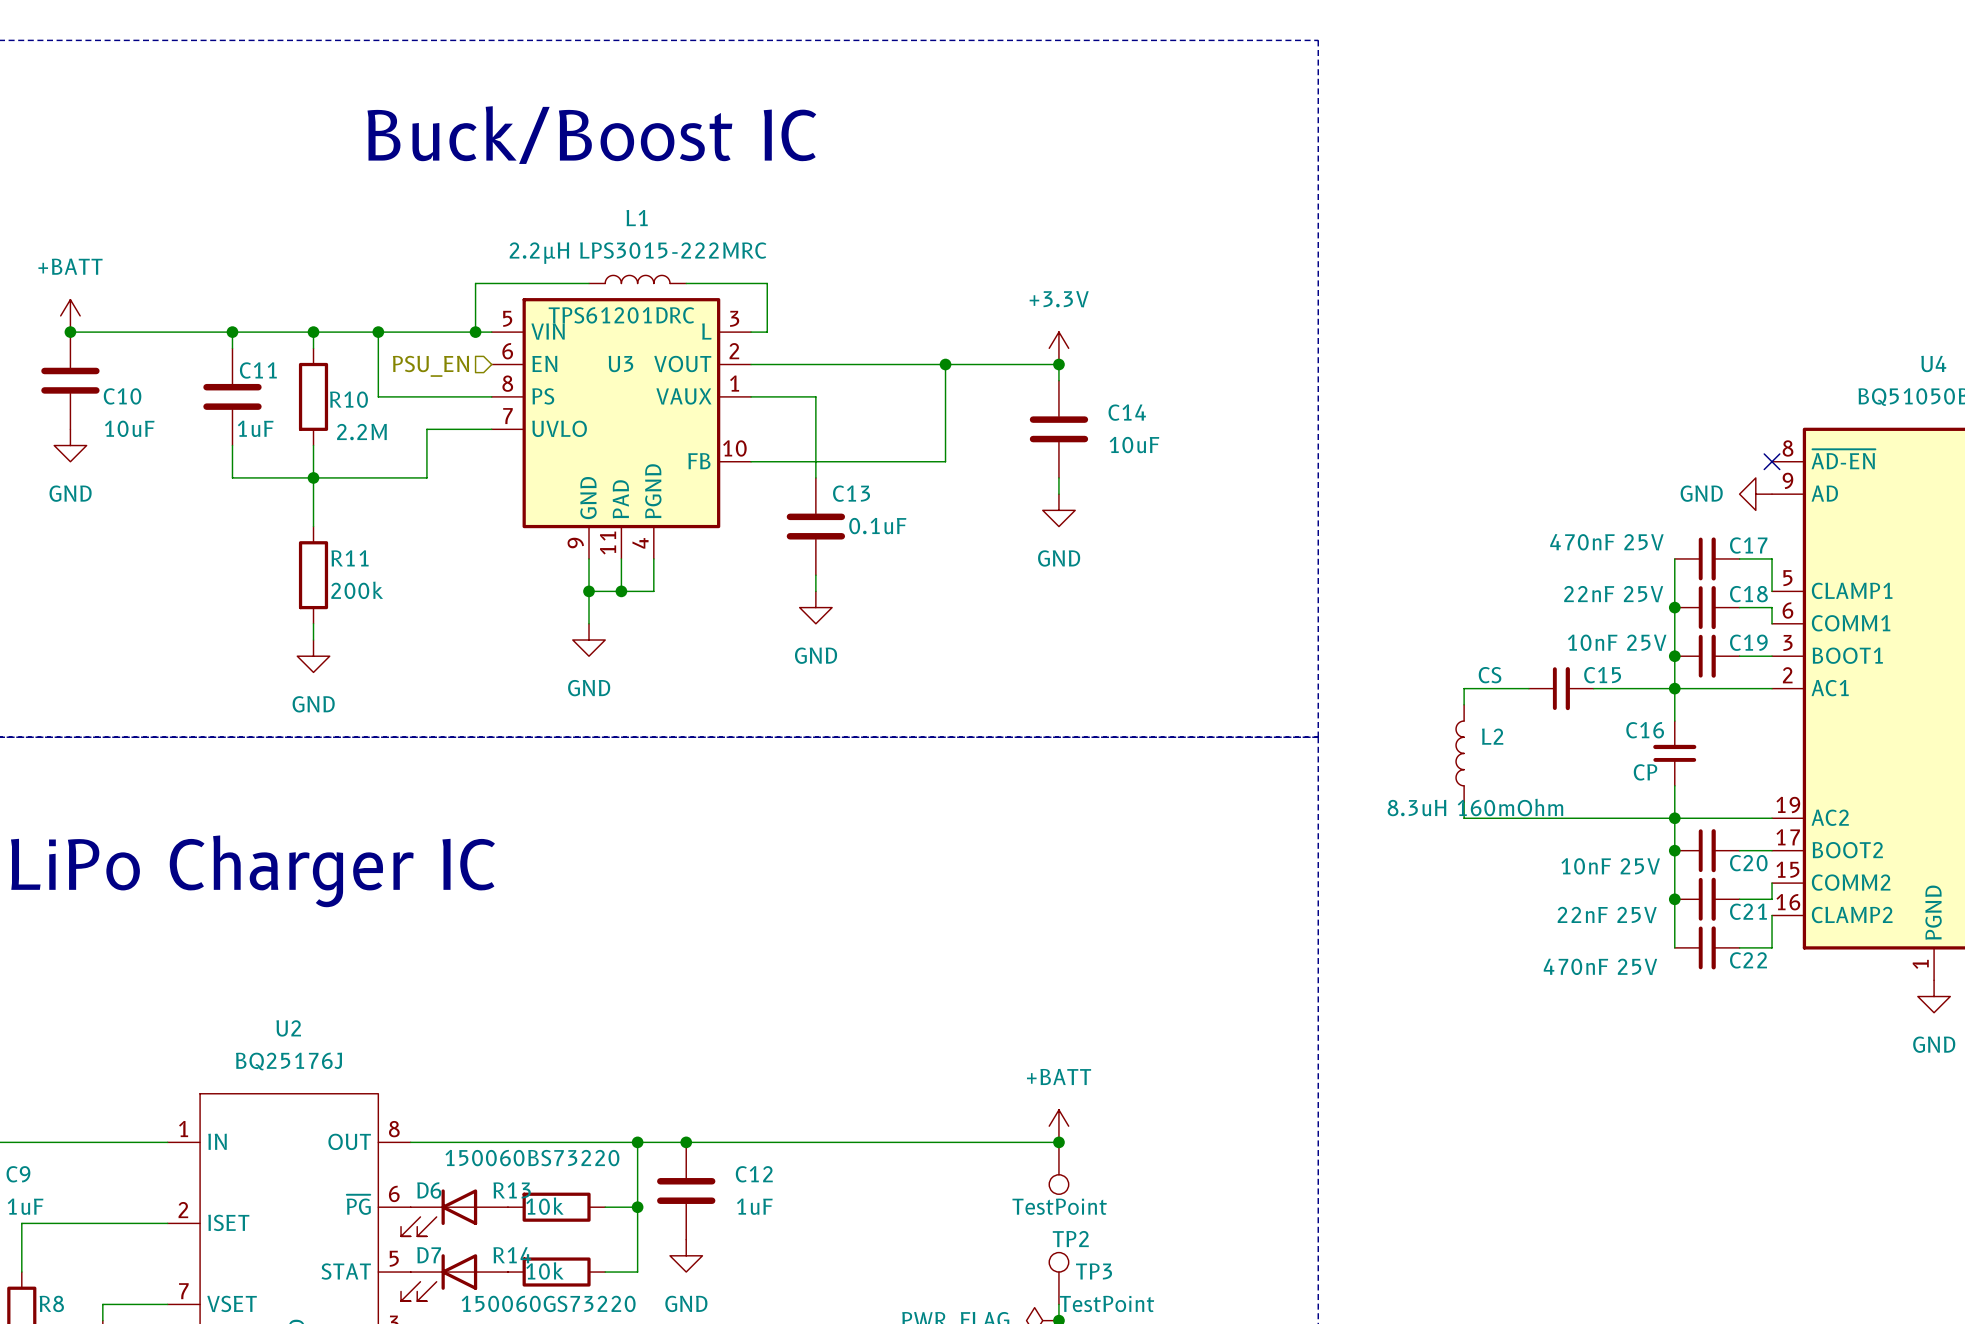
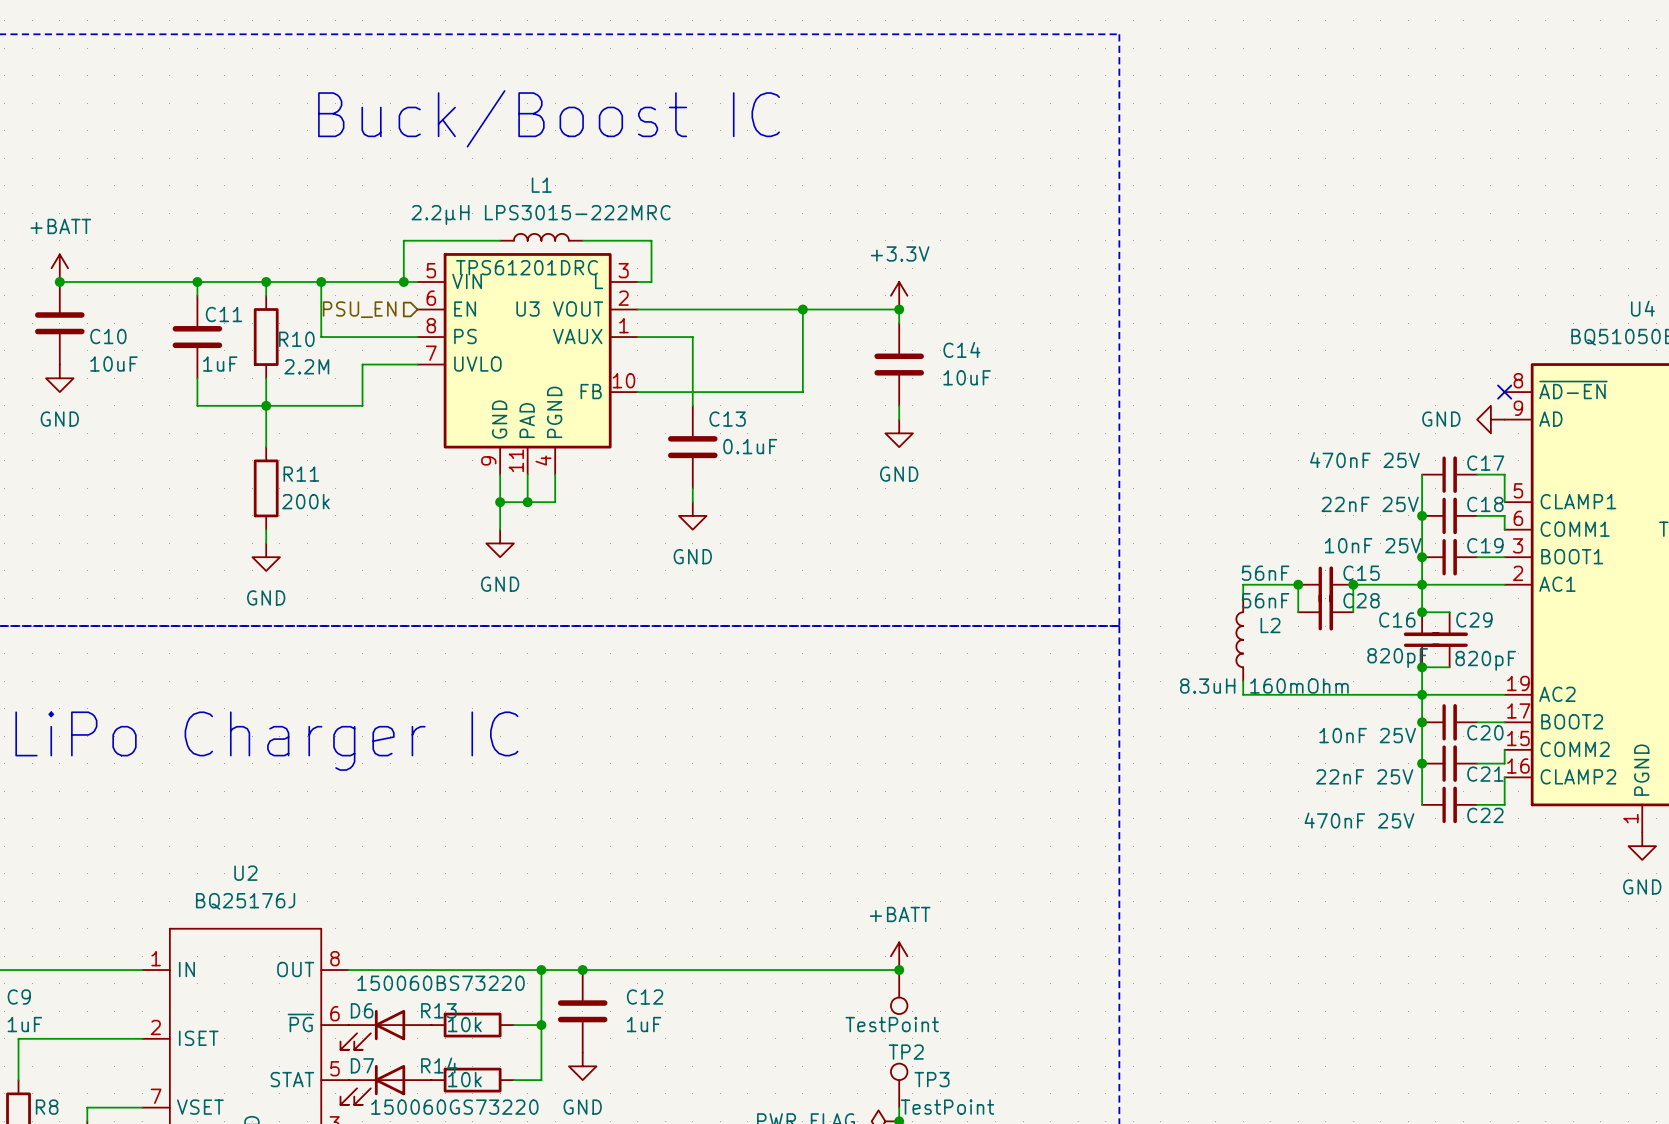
C15 value: CS (1490, 675) -> 56nF (1265, 573)
wire: none -> (1298, 584) (1298, 612)
junction: none -> (1298, 584)
wire: none -> (1353, 584) (1353, 612)
junction: none -> (1353, 584)
C28: none -> 56nF (1325, 612)
wire: none -> (1422, 612) (1449, 612)
junction: none -> (1422, 612)
C29: none -> 820pF (1449, 639)
C16 value: CP (1645, 772) -> 820pF (1397, 658)
wire: none -> (1422, 667) (1449, 667)
junction: none -> (1422, 667)

